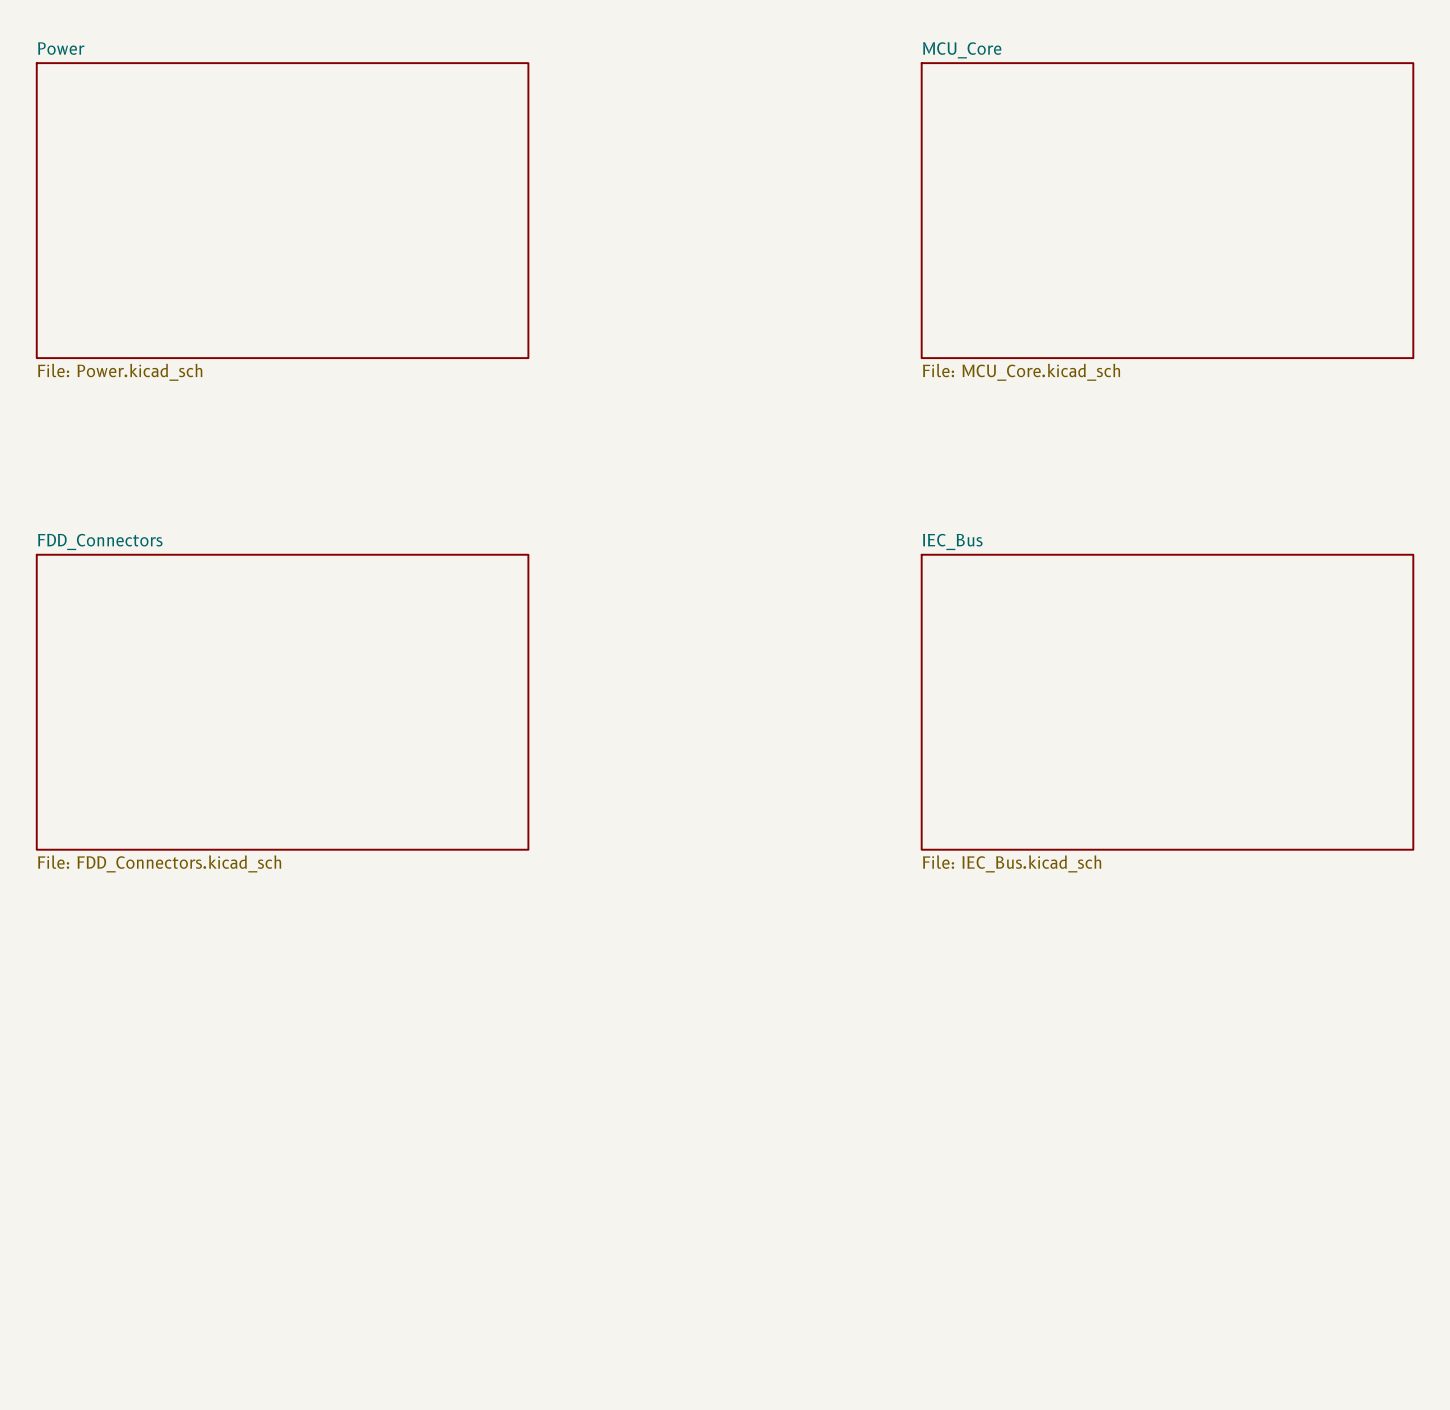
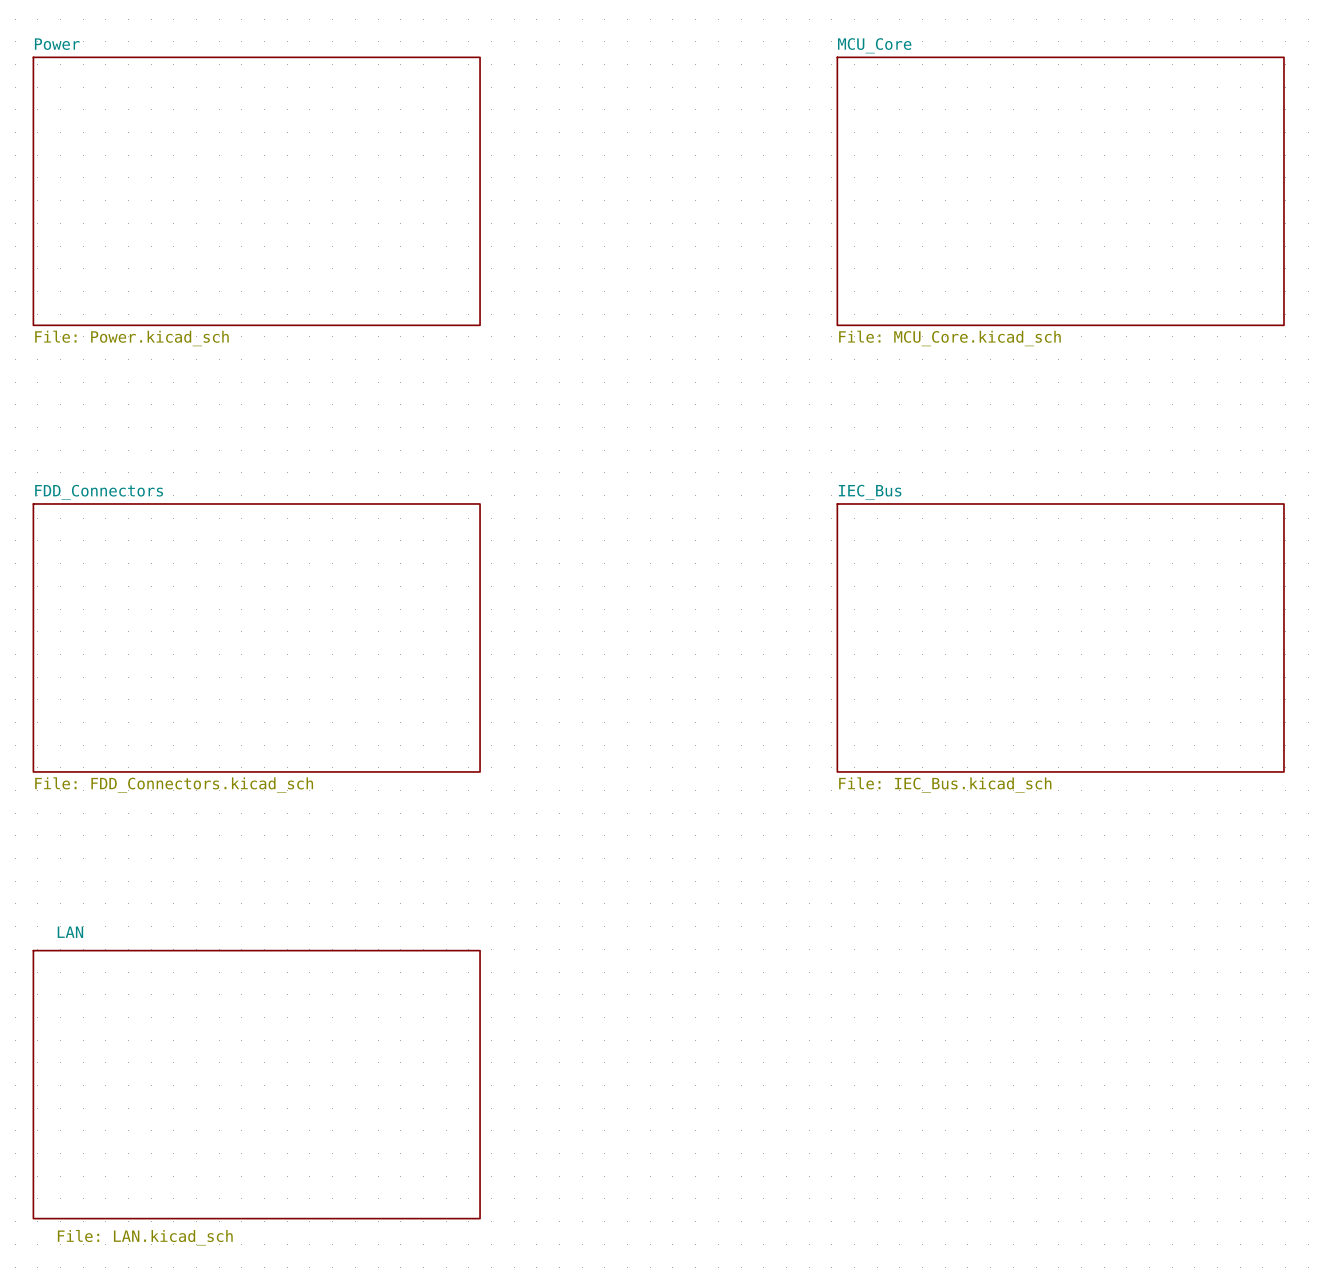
sheet LAN: none -> File: LAN.kicad_sch (256, 1084)

